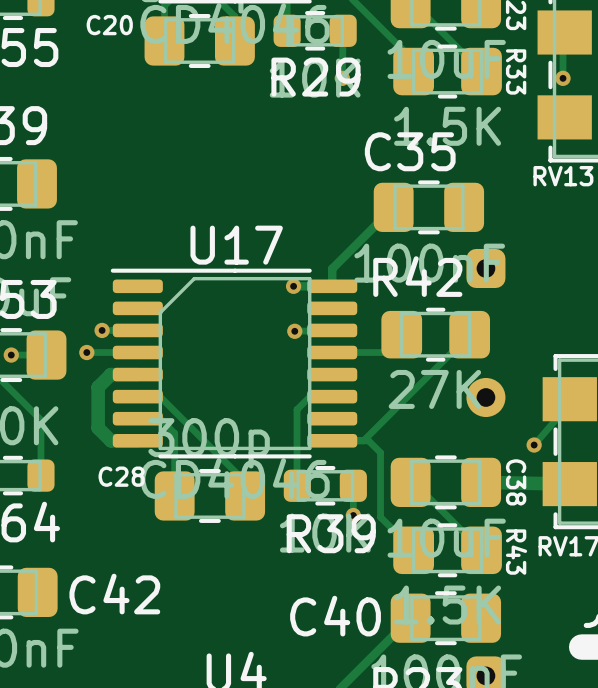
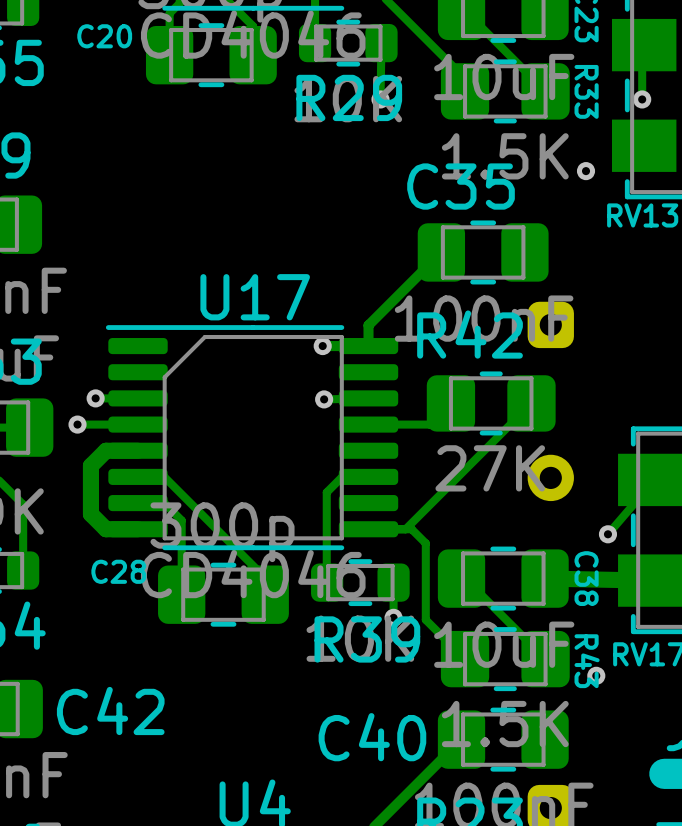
via: none -> (586, 171)
via: none -> (596, 675)

